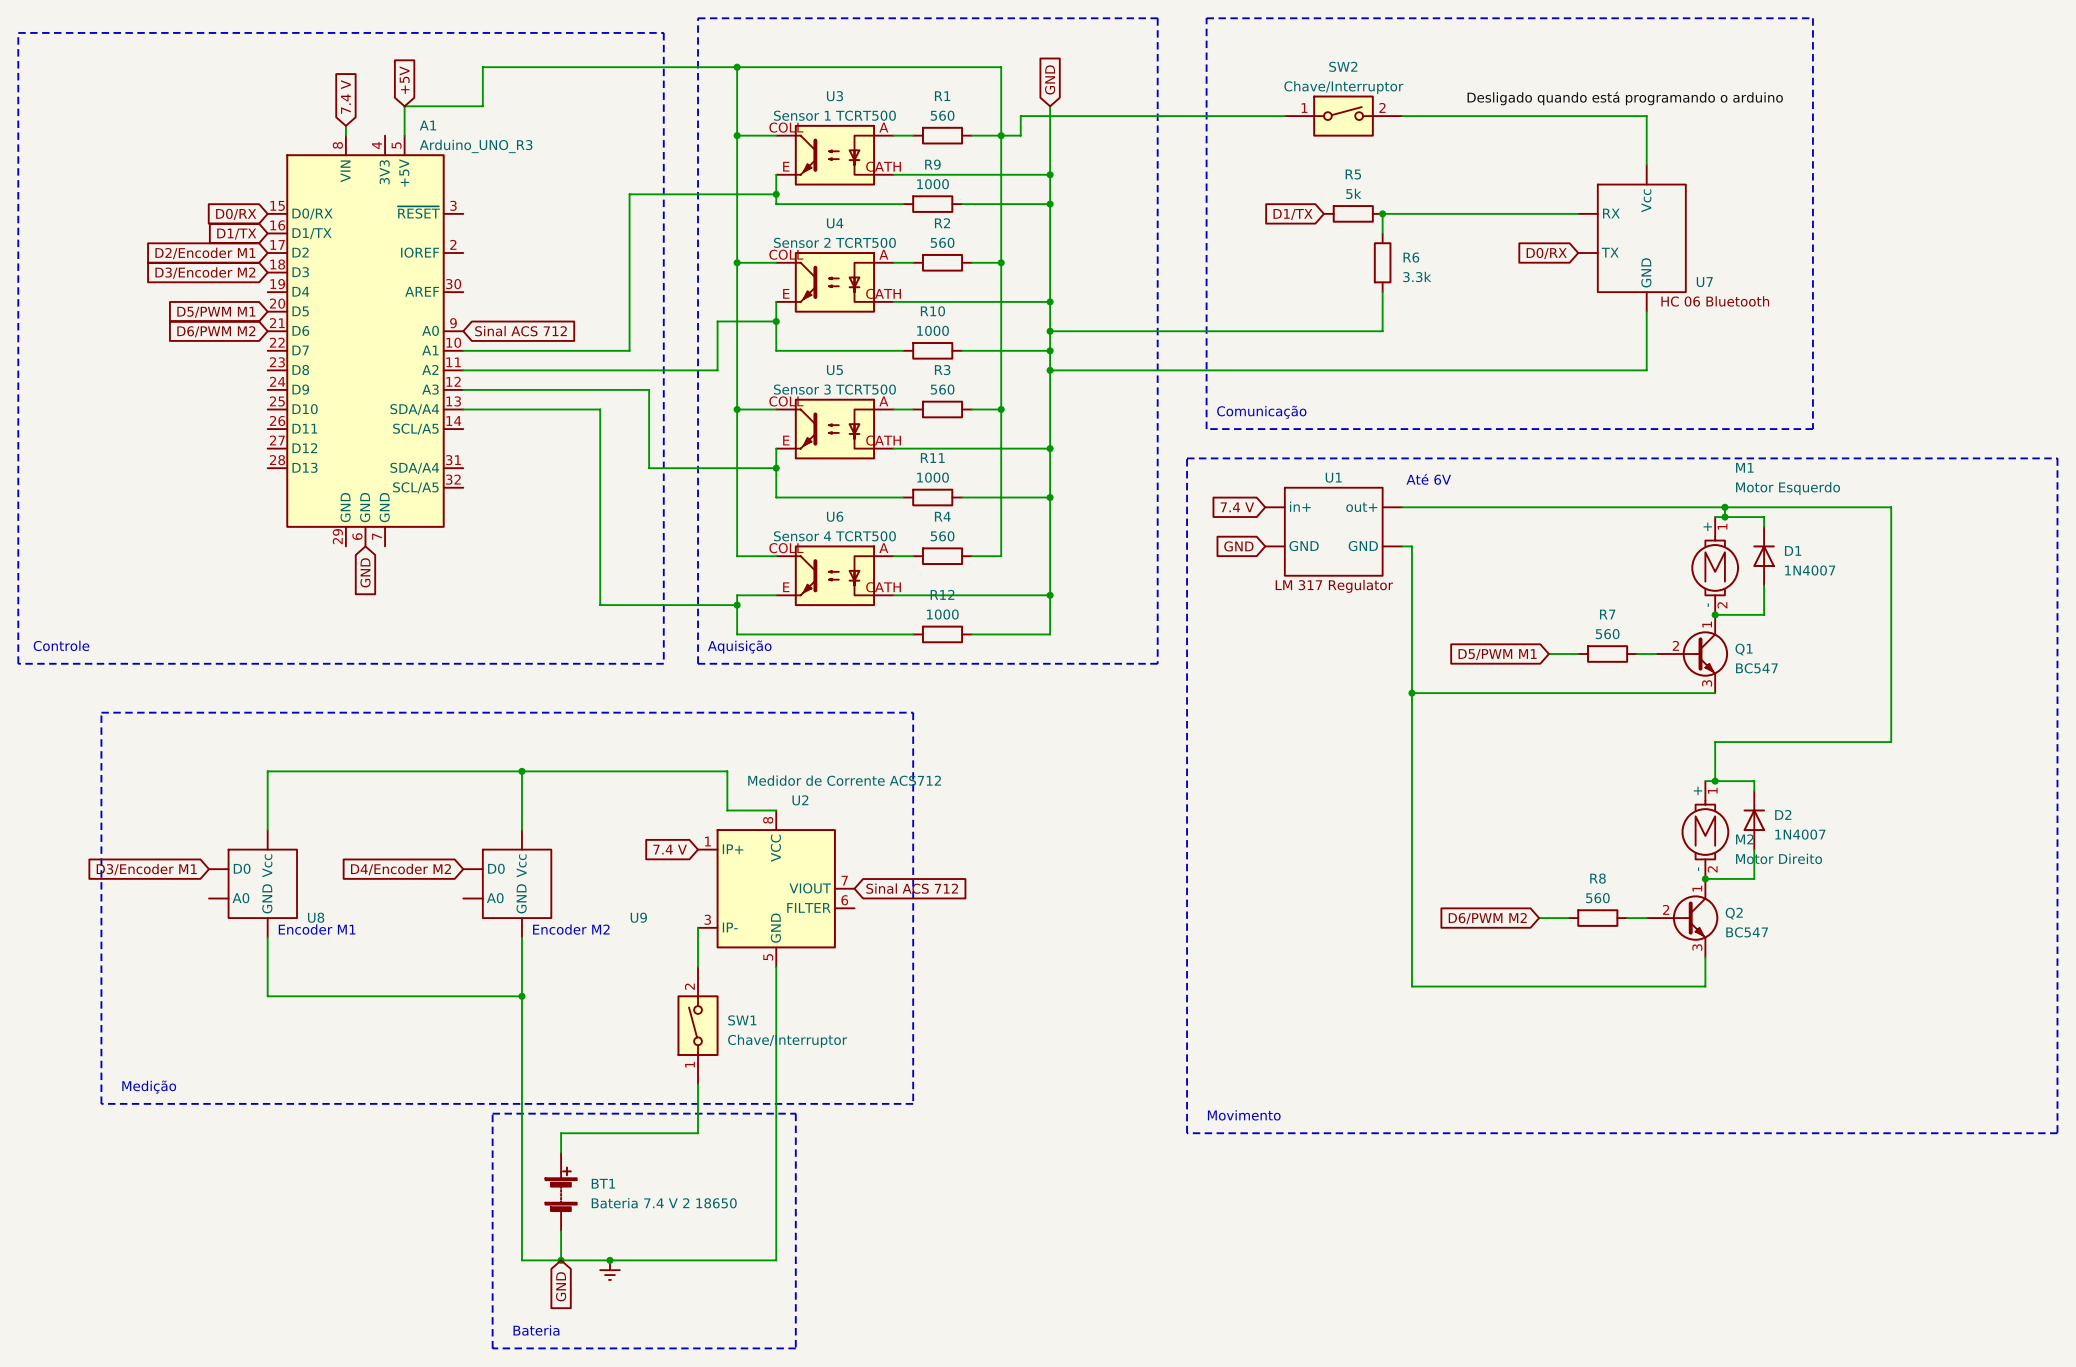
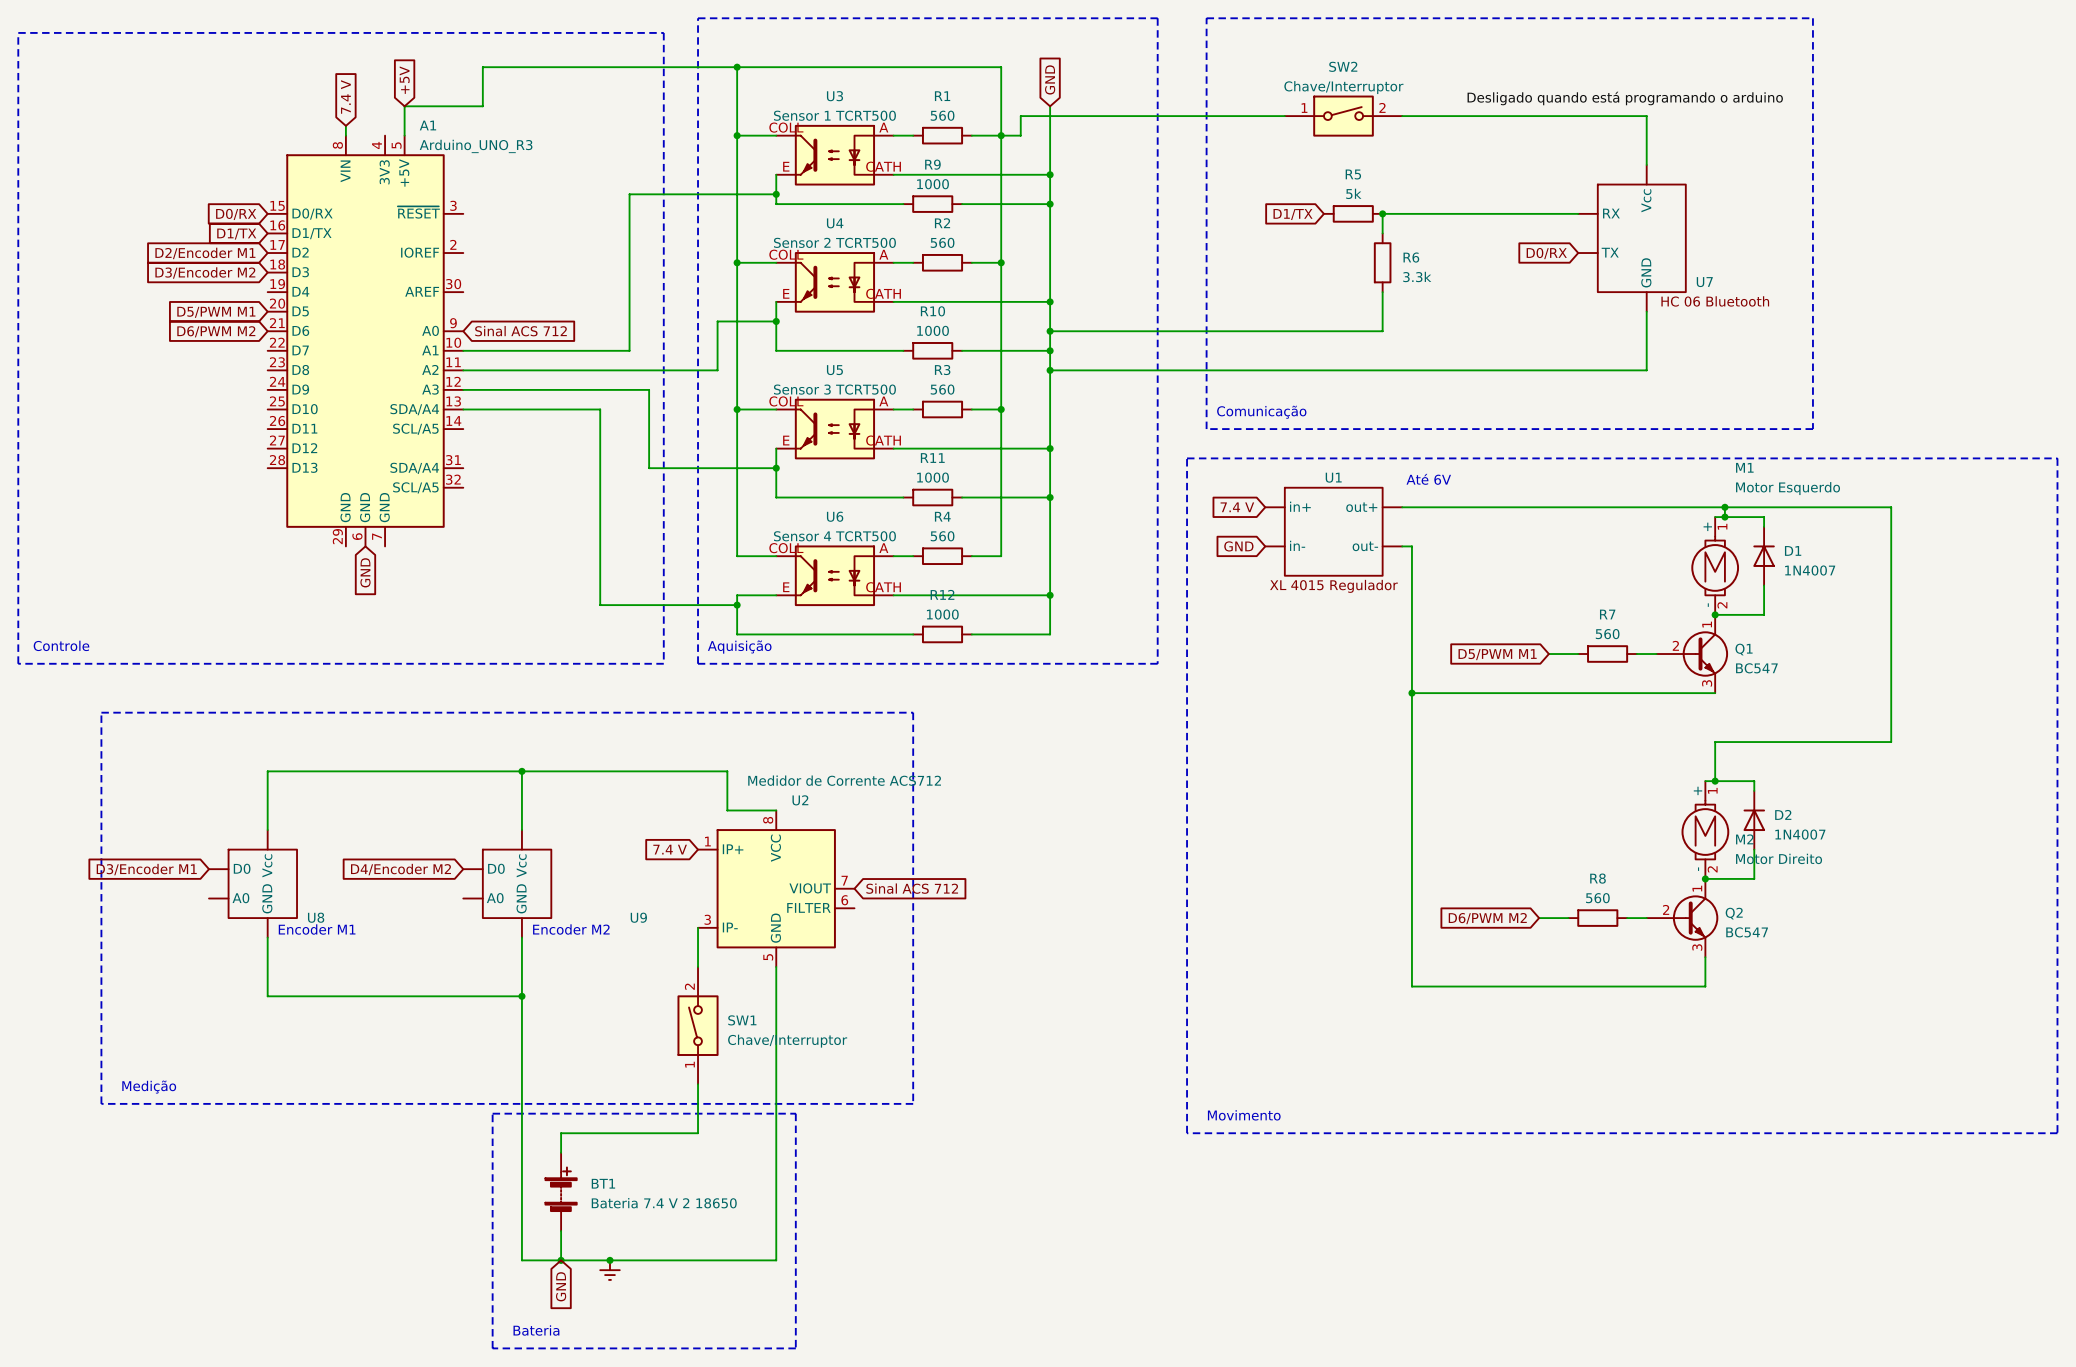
U1 pin name: GND (1304, 546) -> in- (1297, 545)
U1 pin name: GND (1363, 546) -> out- (1365, 546)
U1 text: LM 317 Regulator (1334, 586) -> XL 4015 Regulador (1333, 586)

